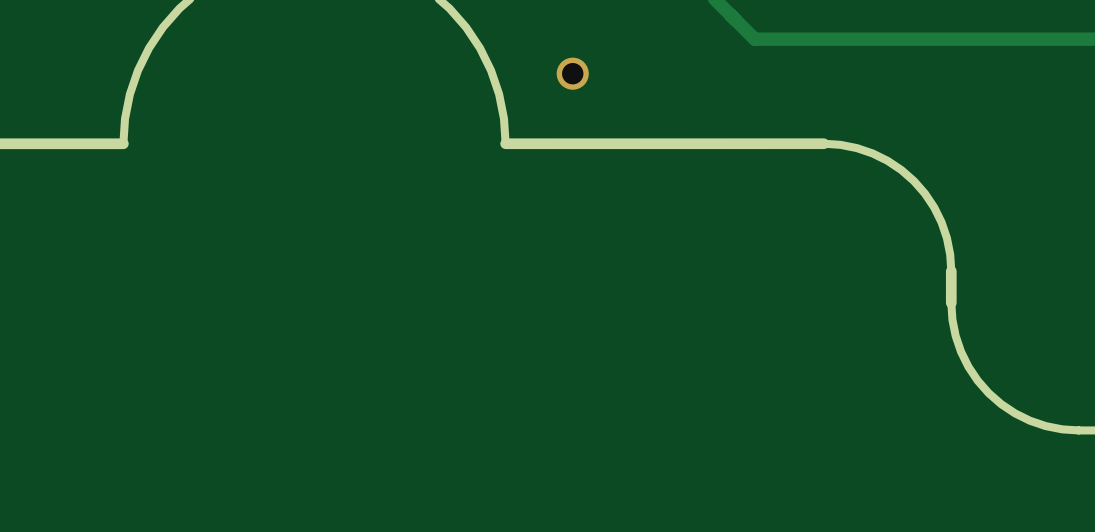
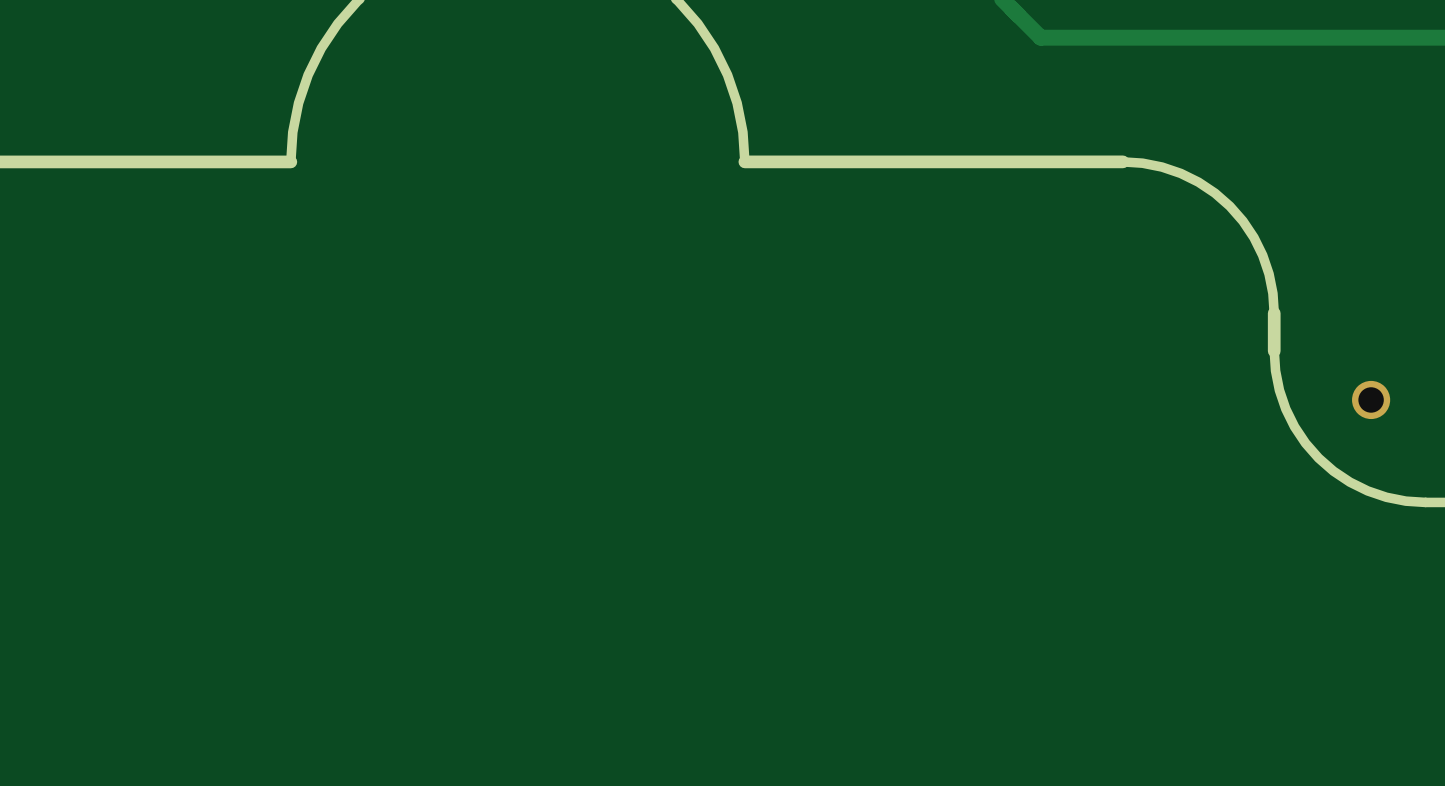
via: (572, 73) -> none
via: none -> (1371, 399)

